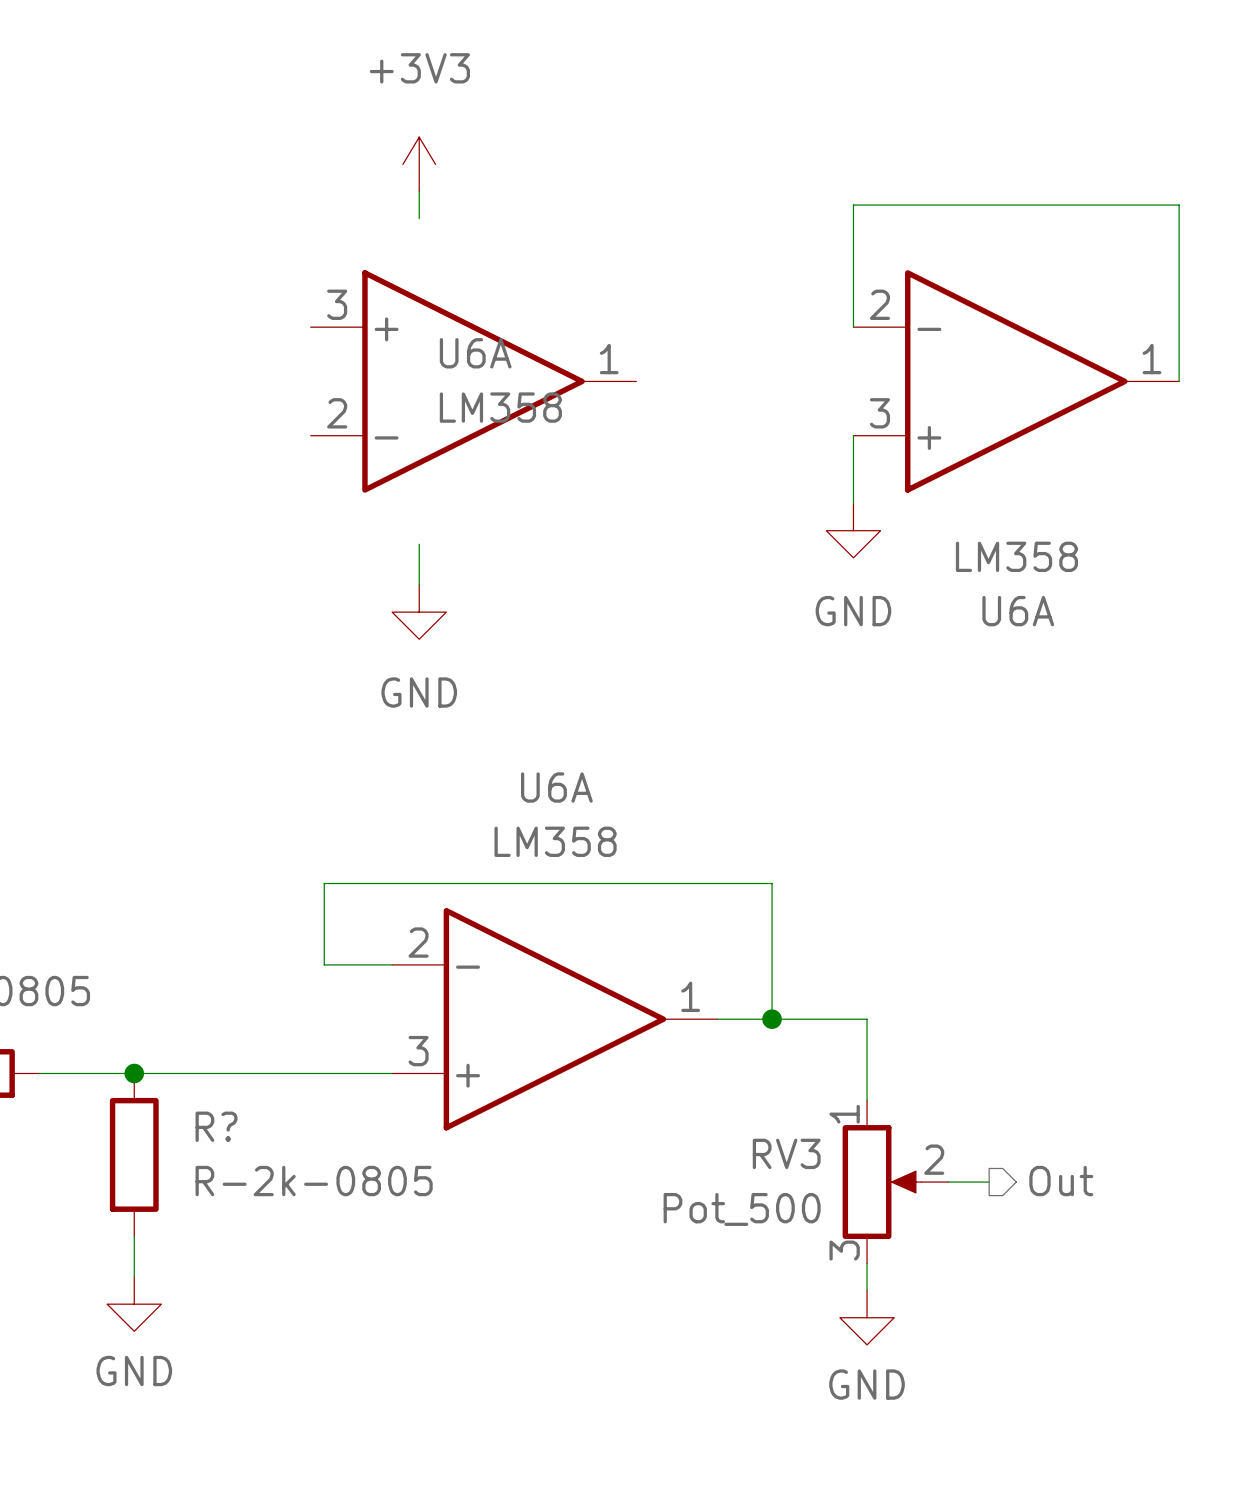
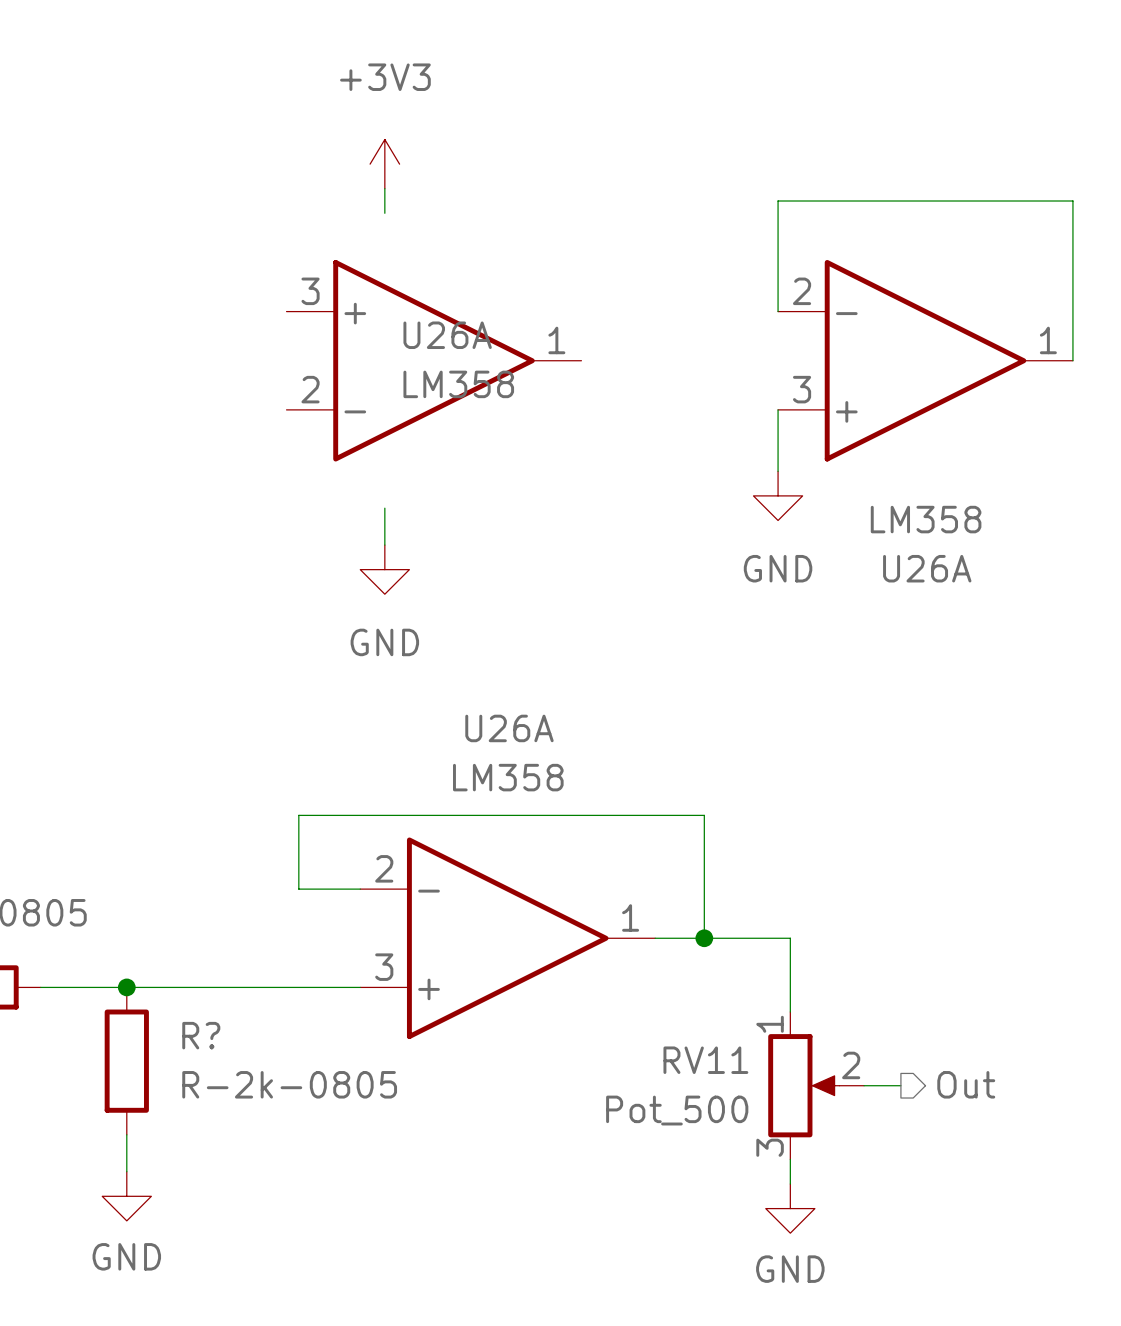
U6A name: U6A (475, 353) -> U26A (447, 335)
U6A name: U6A (1018, 611) -> U26A (927, 568)
U6A name: U6A (556, 787) -> U26A (509, 728)
RV3 name: RV3 (786, 1153) -> RV11 (705, 1060)

